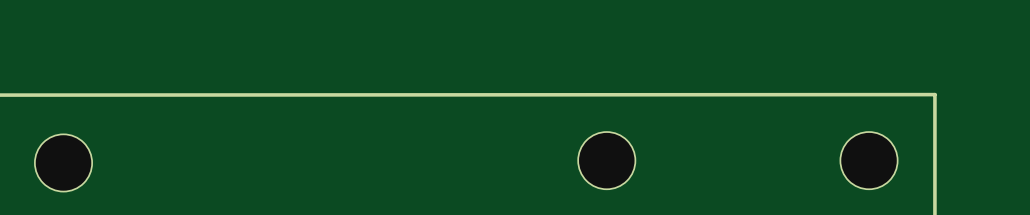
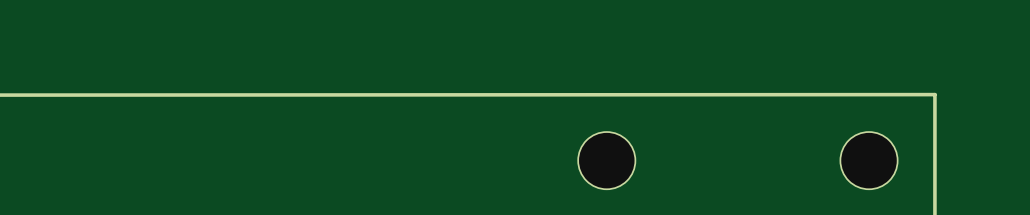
part: (63, 162) -> none

